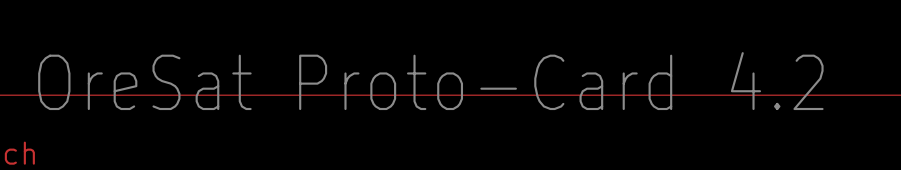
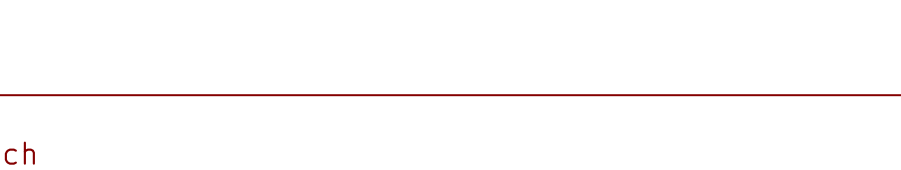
text: 4.2 (777, 81) -> none
text: OreSat Proto-Card (355, 82) -> none

